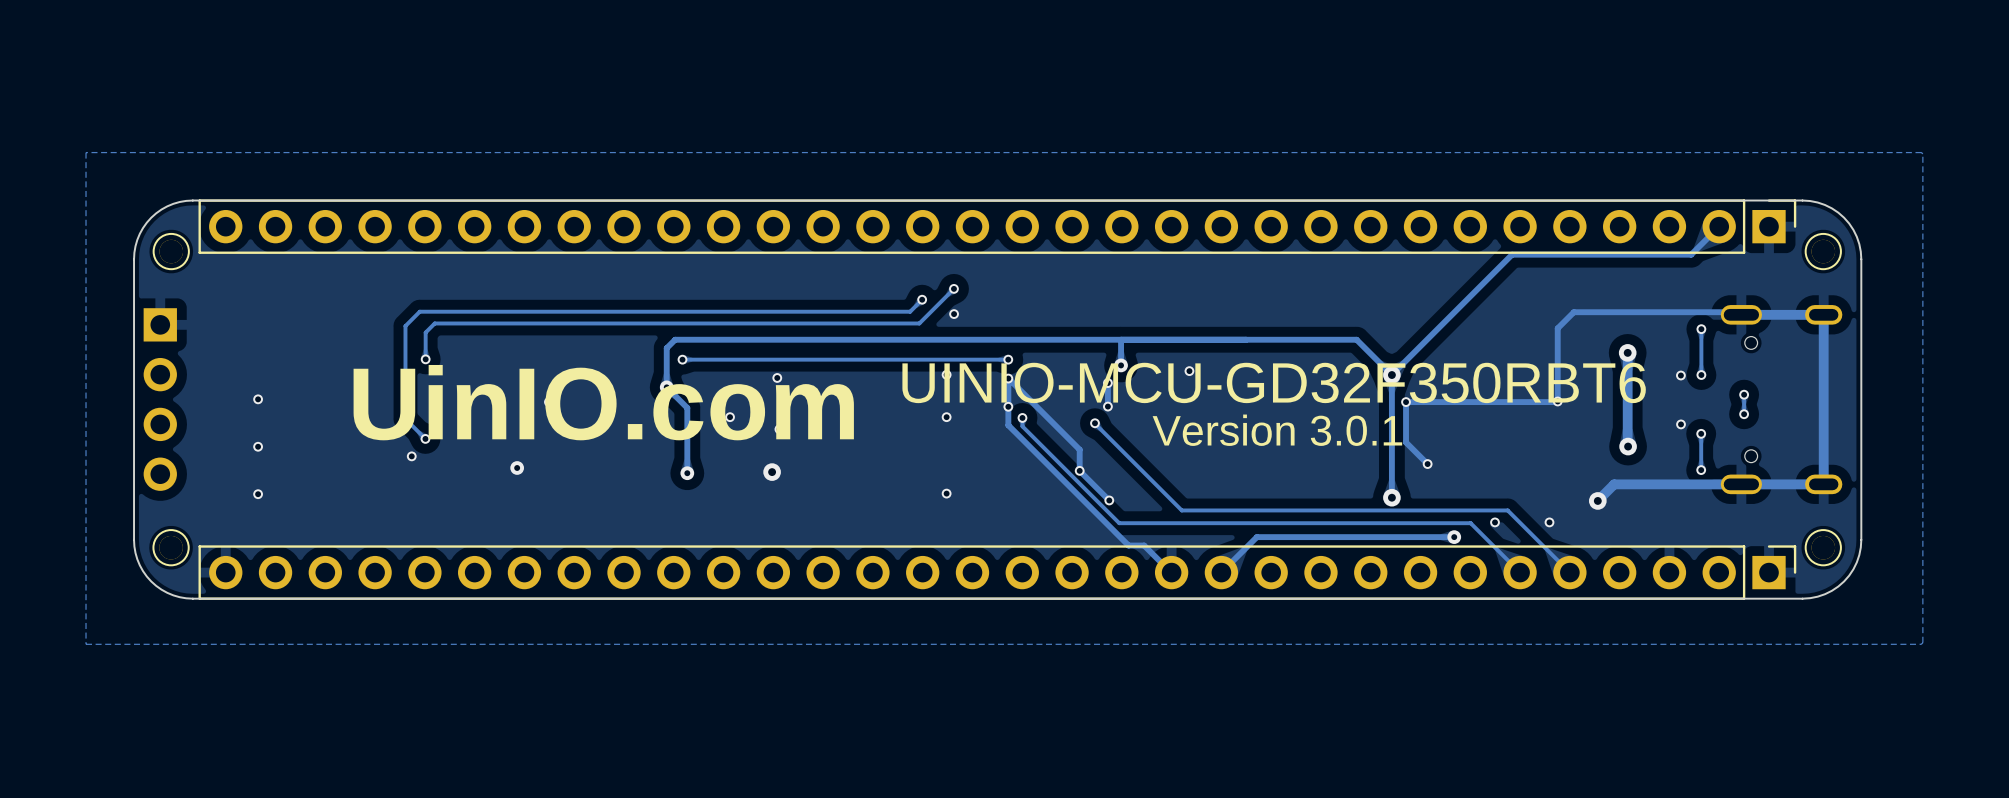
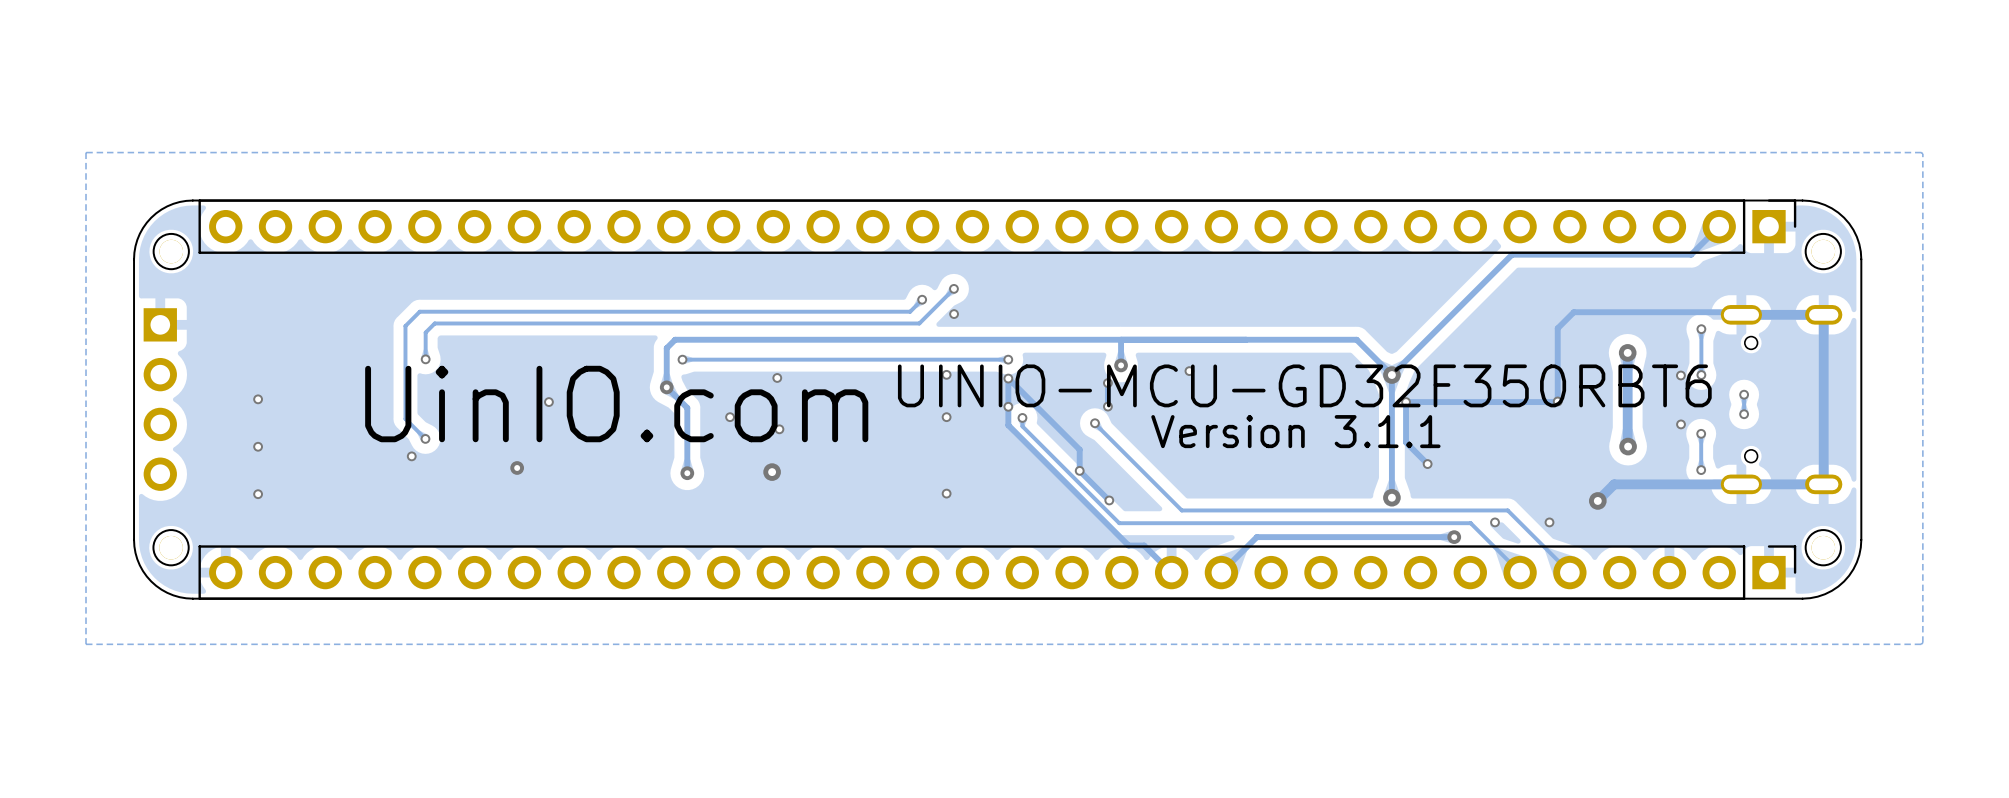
text position: UINIO-MCU-GD32F350RBT6 (1274, 382) -> UINIO-MCU-GD32F350RBT6 (1304, 385)
text: Version 3.0.1 (1277, 430) -> Version 3.1.1 (1295, 431)

